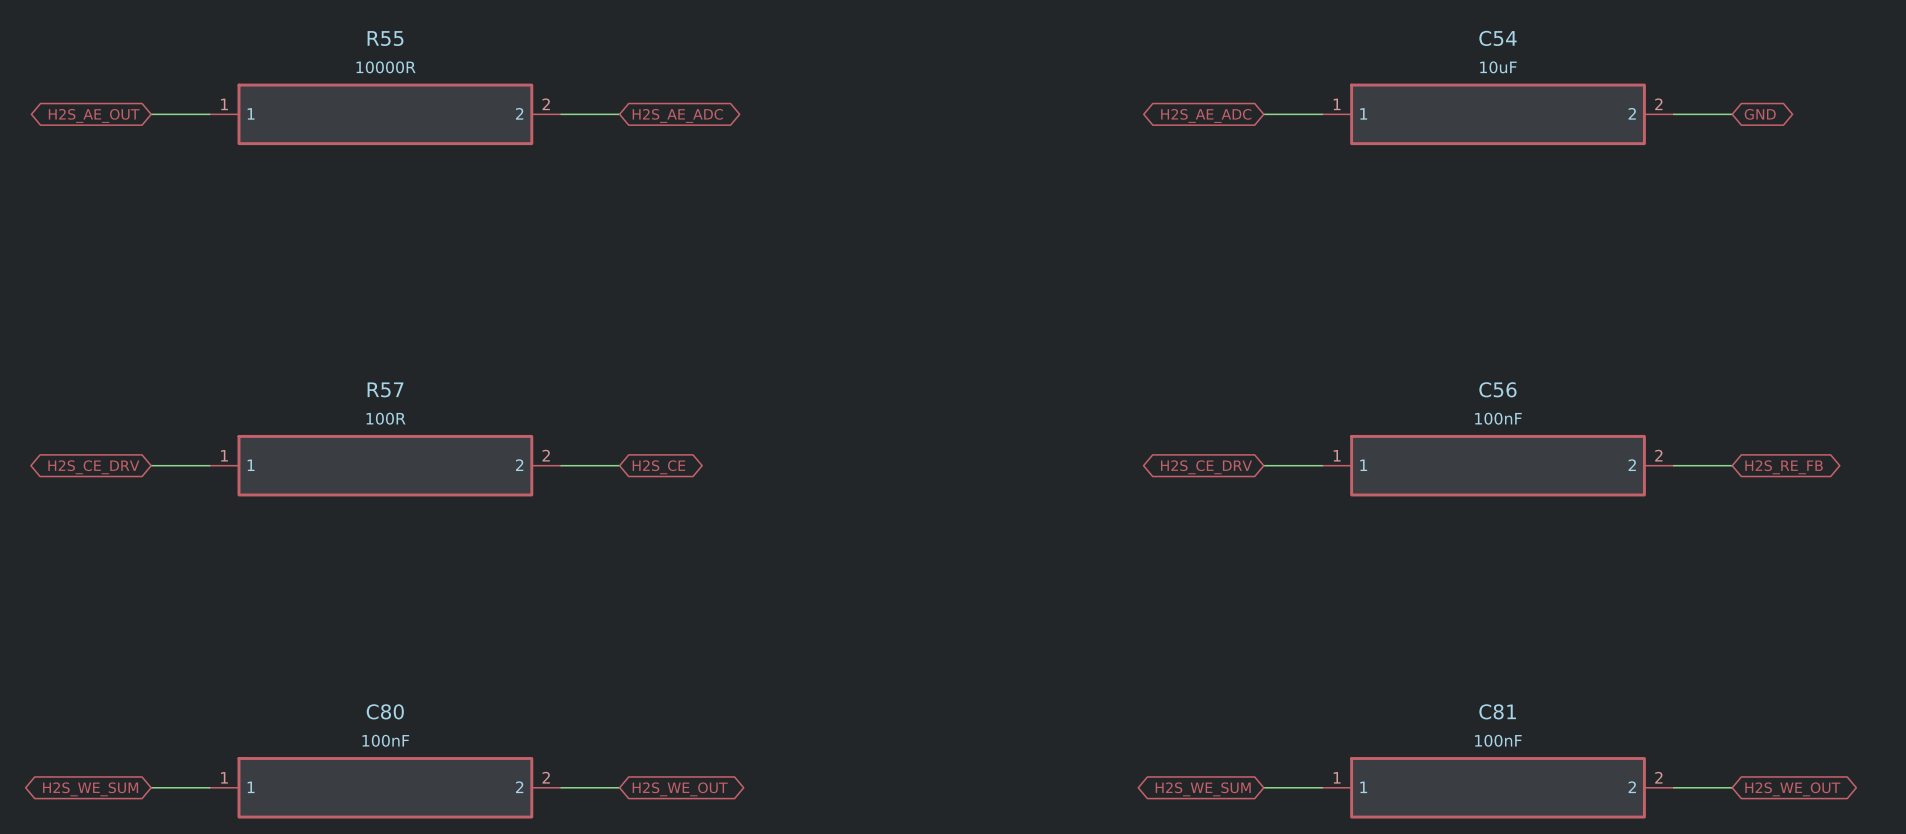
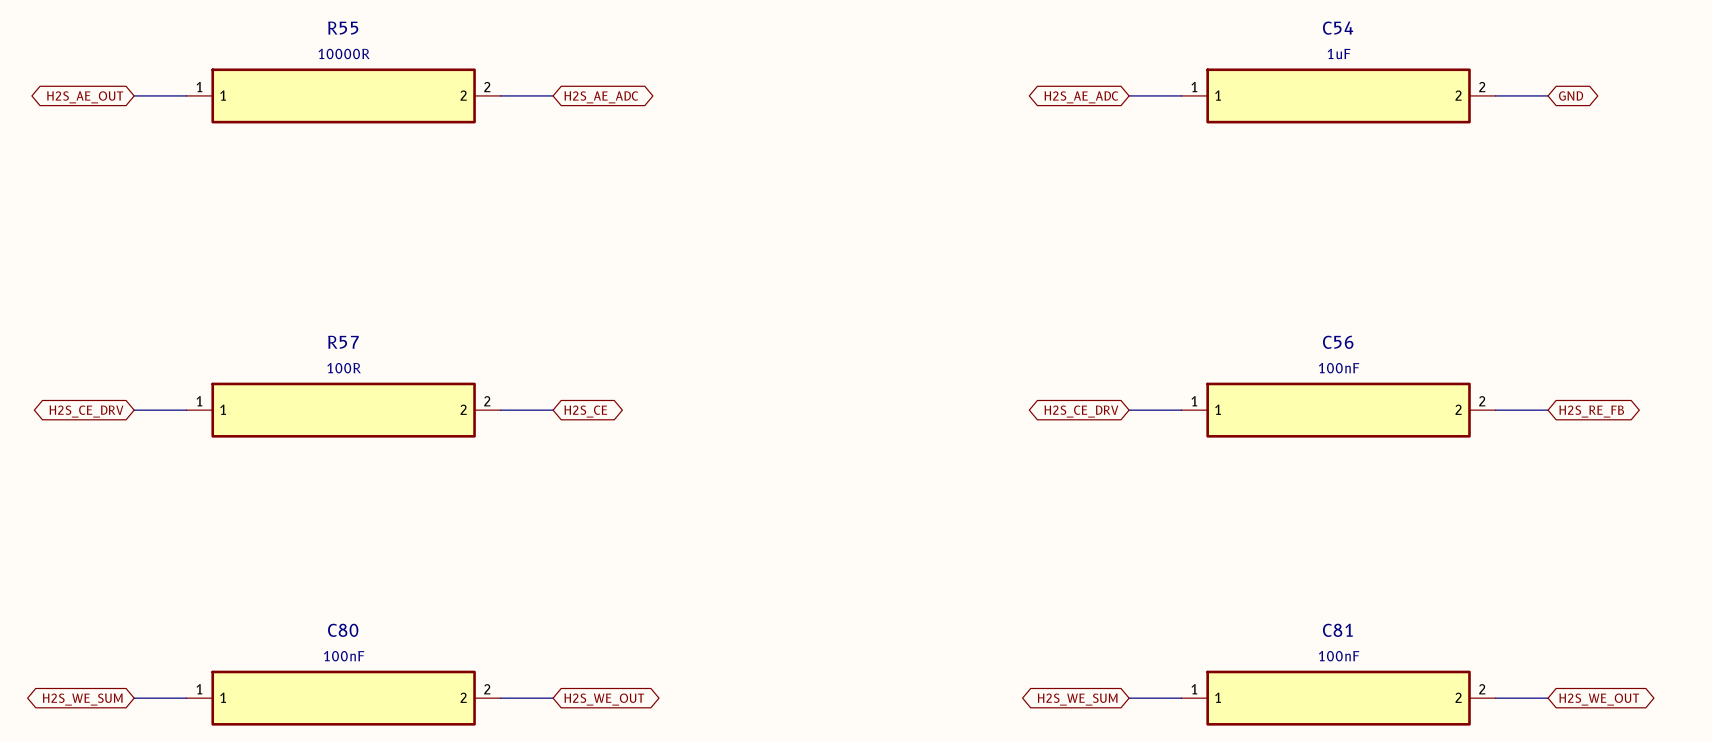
C54 value: 10uF (1498, 67) -> 1uF (1339, 53)

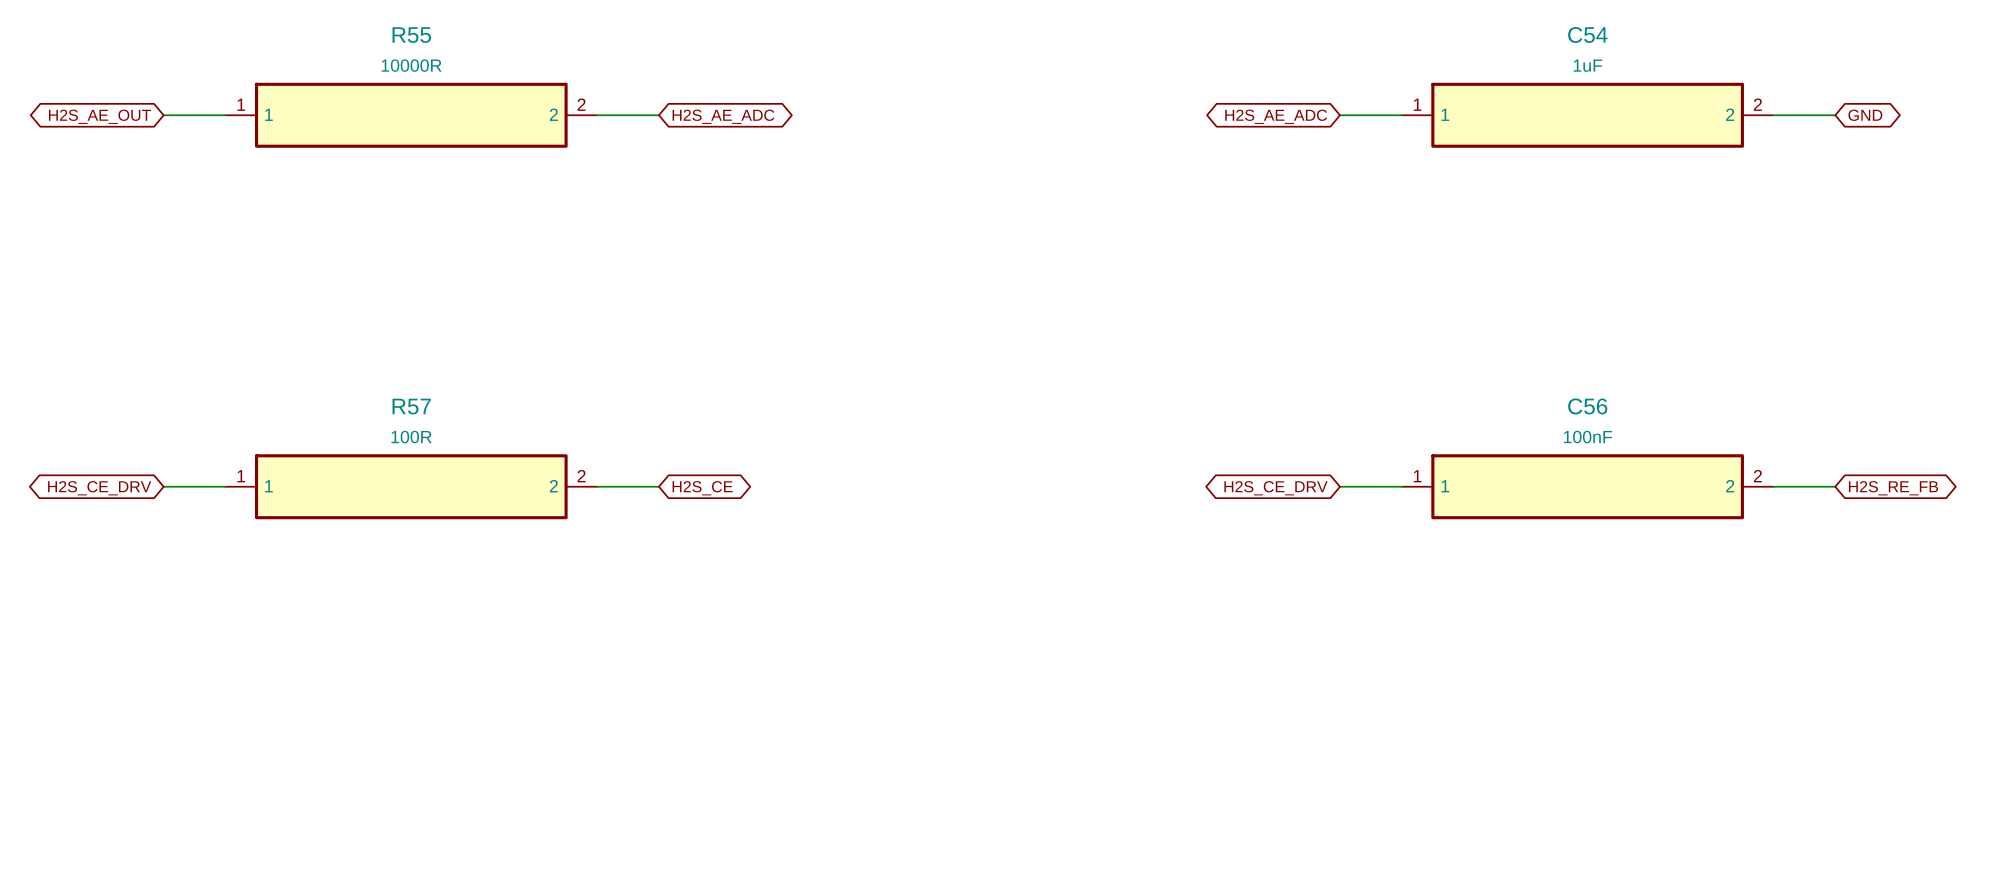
wire: (134, 698) (186, 698) -> none
C80: 100nF (343, 698) -> none
wire: (500, 698) (553, 698) -> none
wire: (1129, 698) (1181, 698) -> none
C81: 100nF (1338, 698) -> none
wire: (1495, 698) (1548, 698) -> none
global label: H2S_WE_SUM (82, 699) -> none
global label: H2S_WE_OUT (604, 699) -> none
global label: H2S_WE_SUM (1077, 699) -> none
global label: H2S_WE_OUT (1599, 699) -> none

